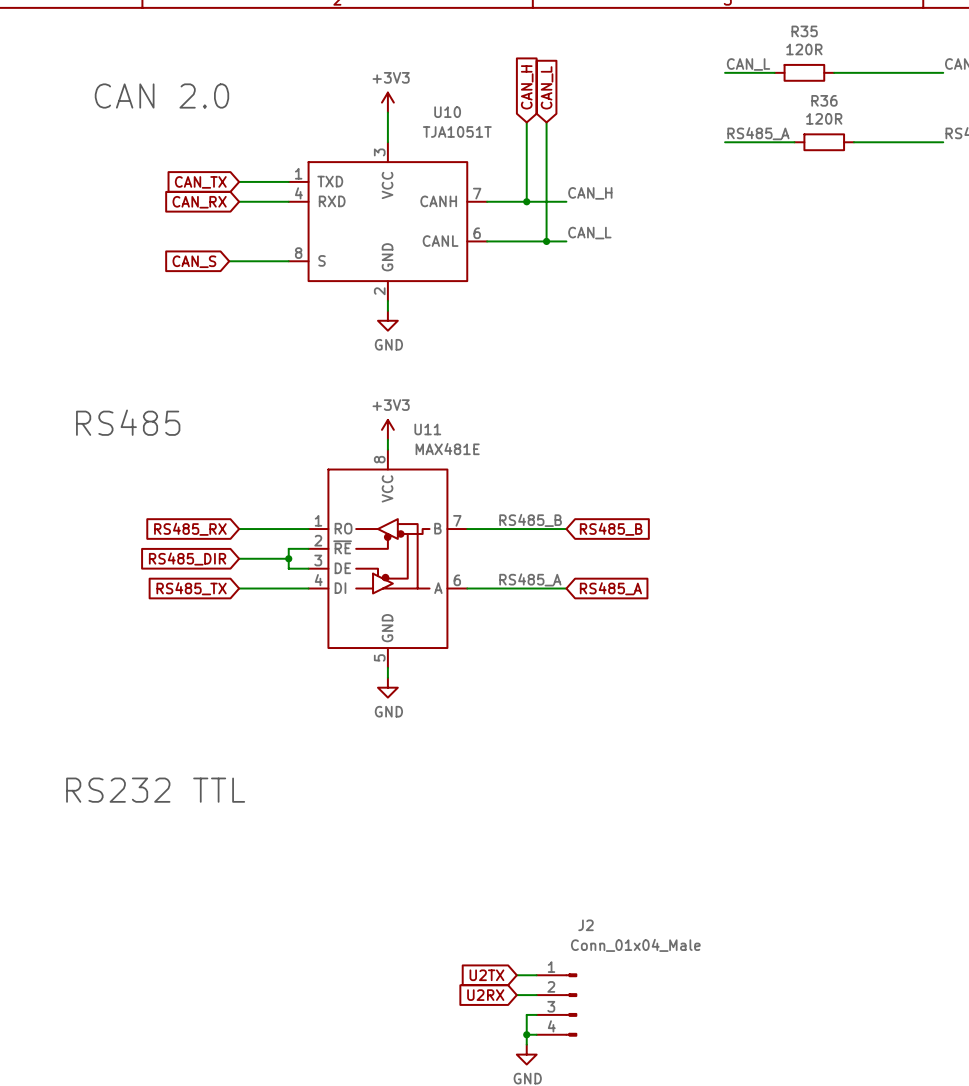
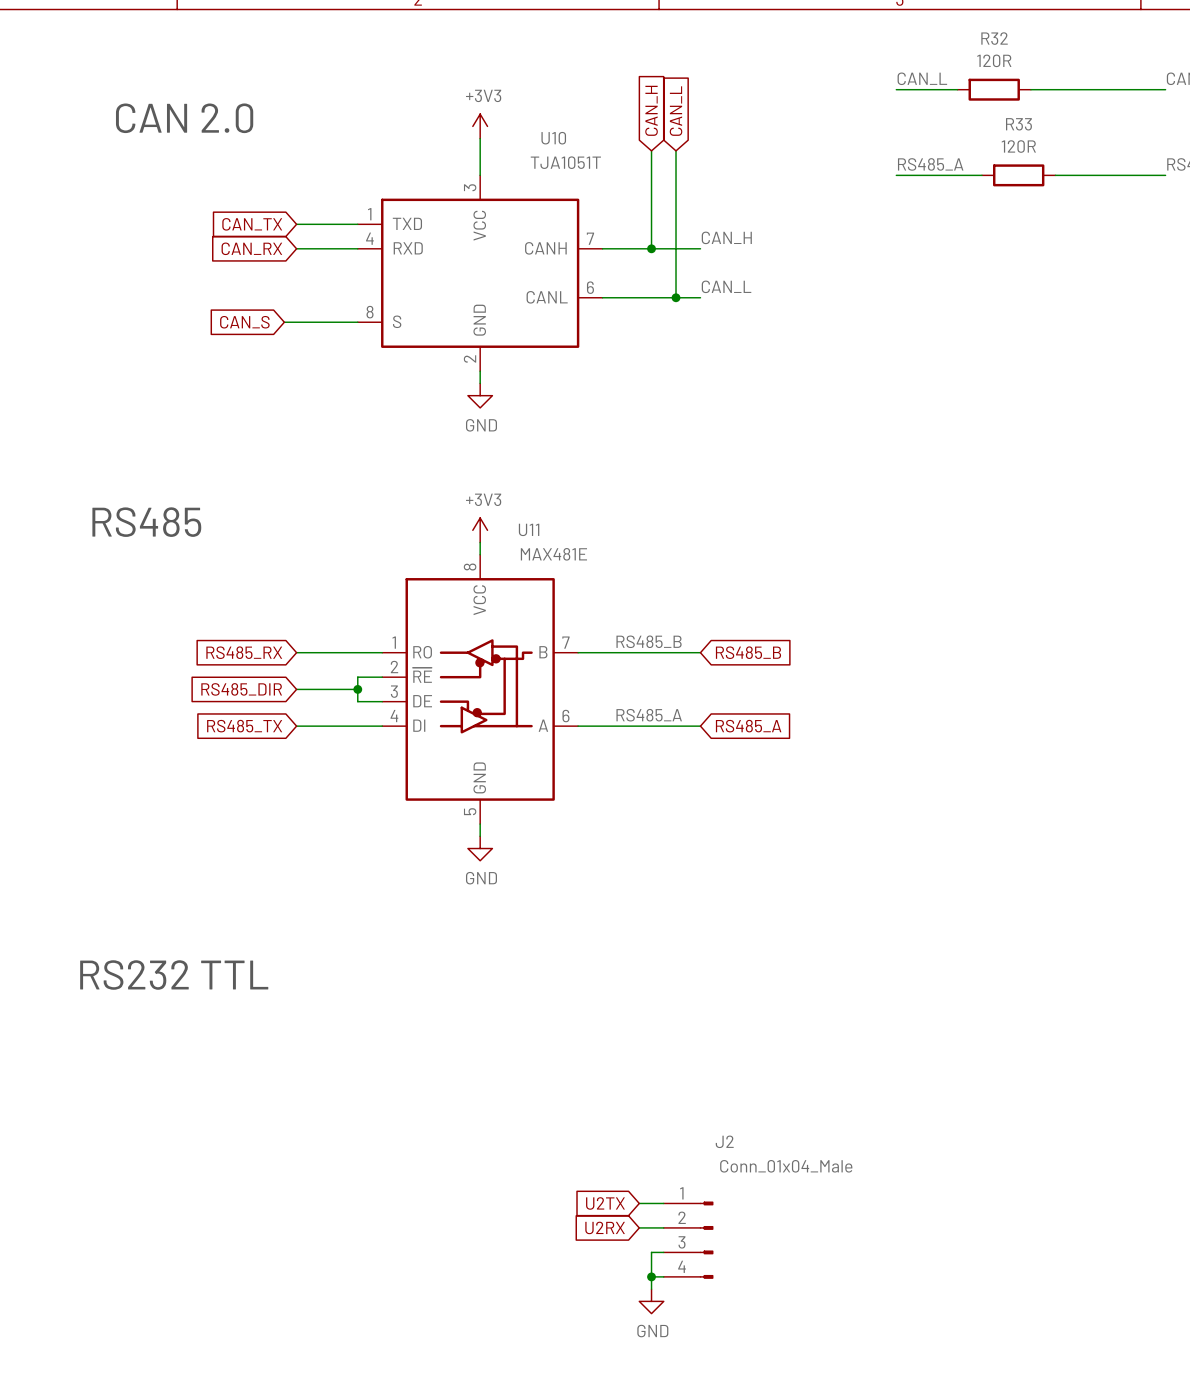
R35 name: R35 (804, 31) -> R32 (994, 38)
R36 name: R36 (824, 100) -> R33 (1018, 124)

